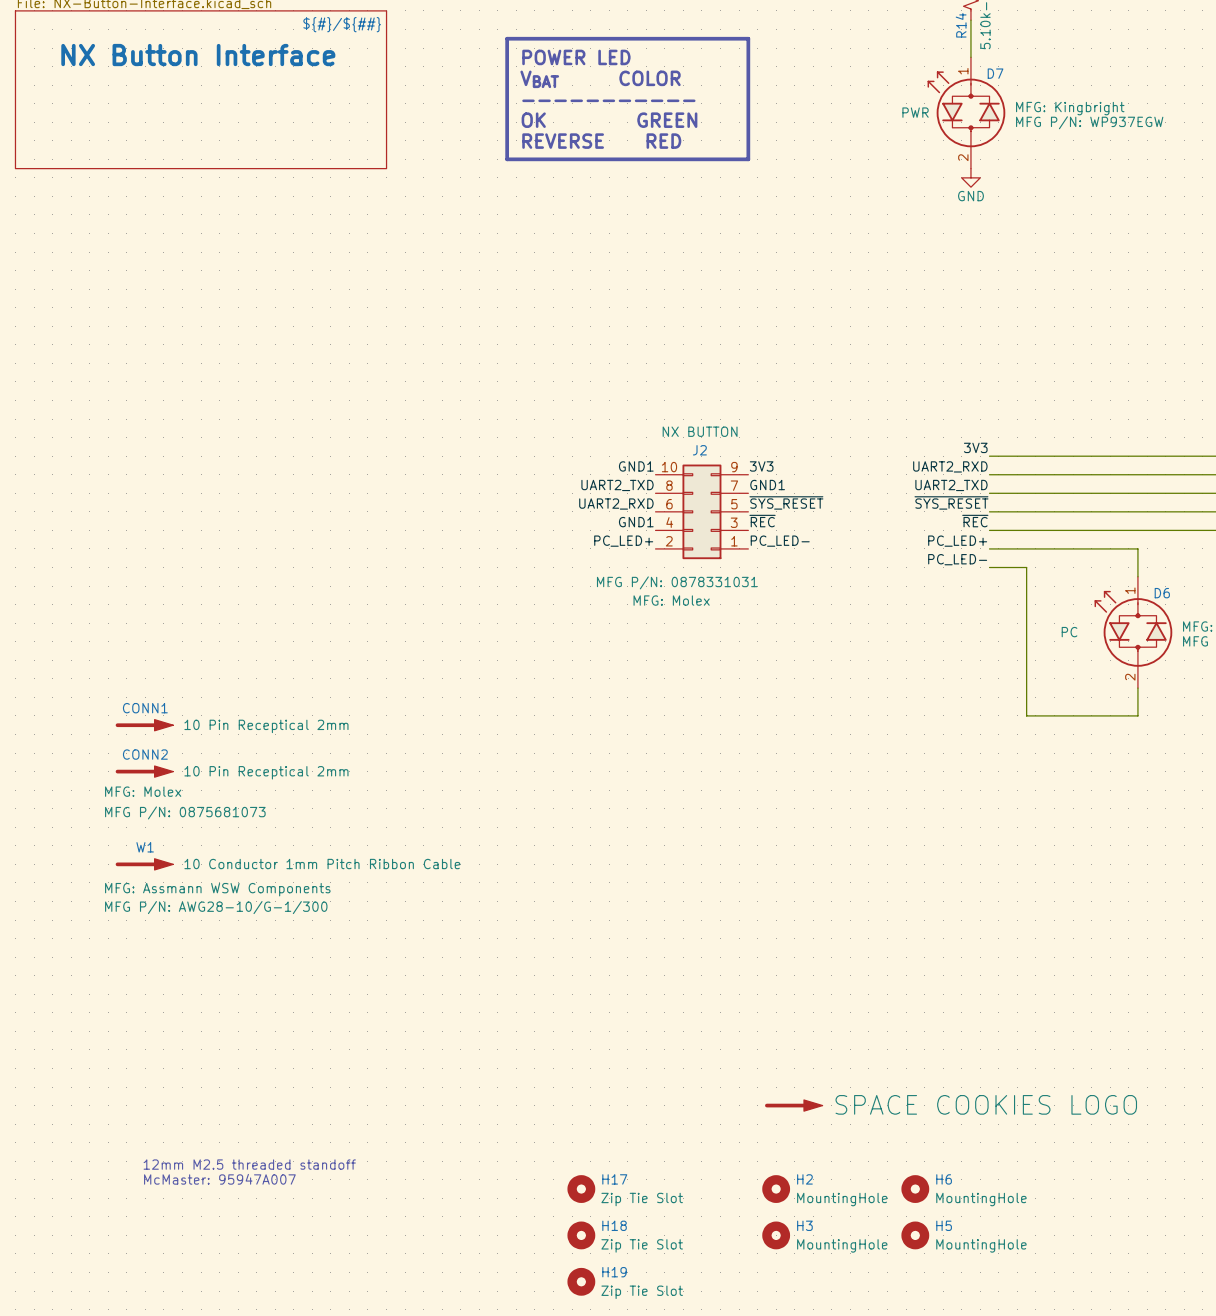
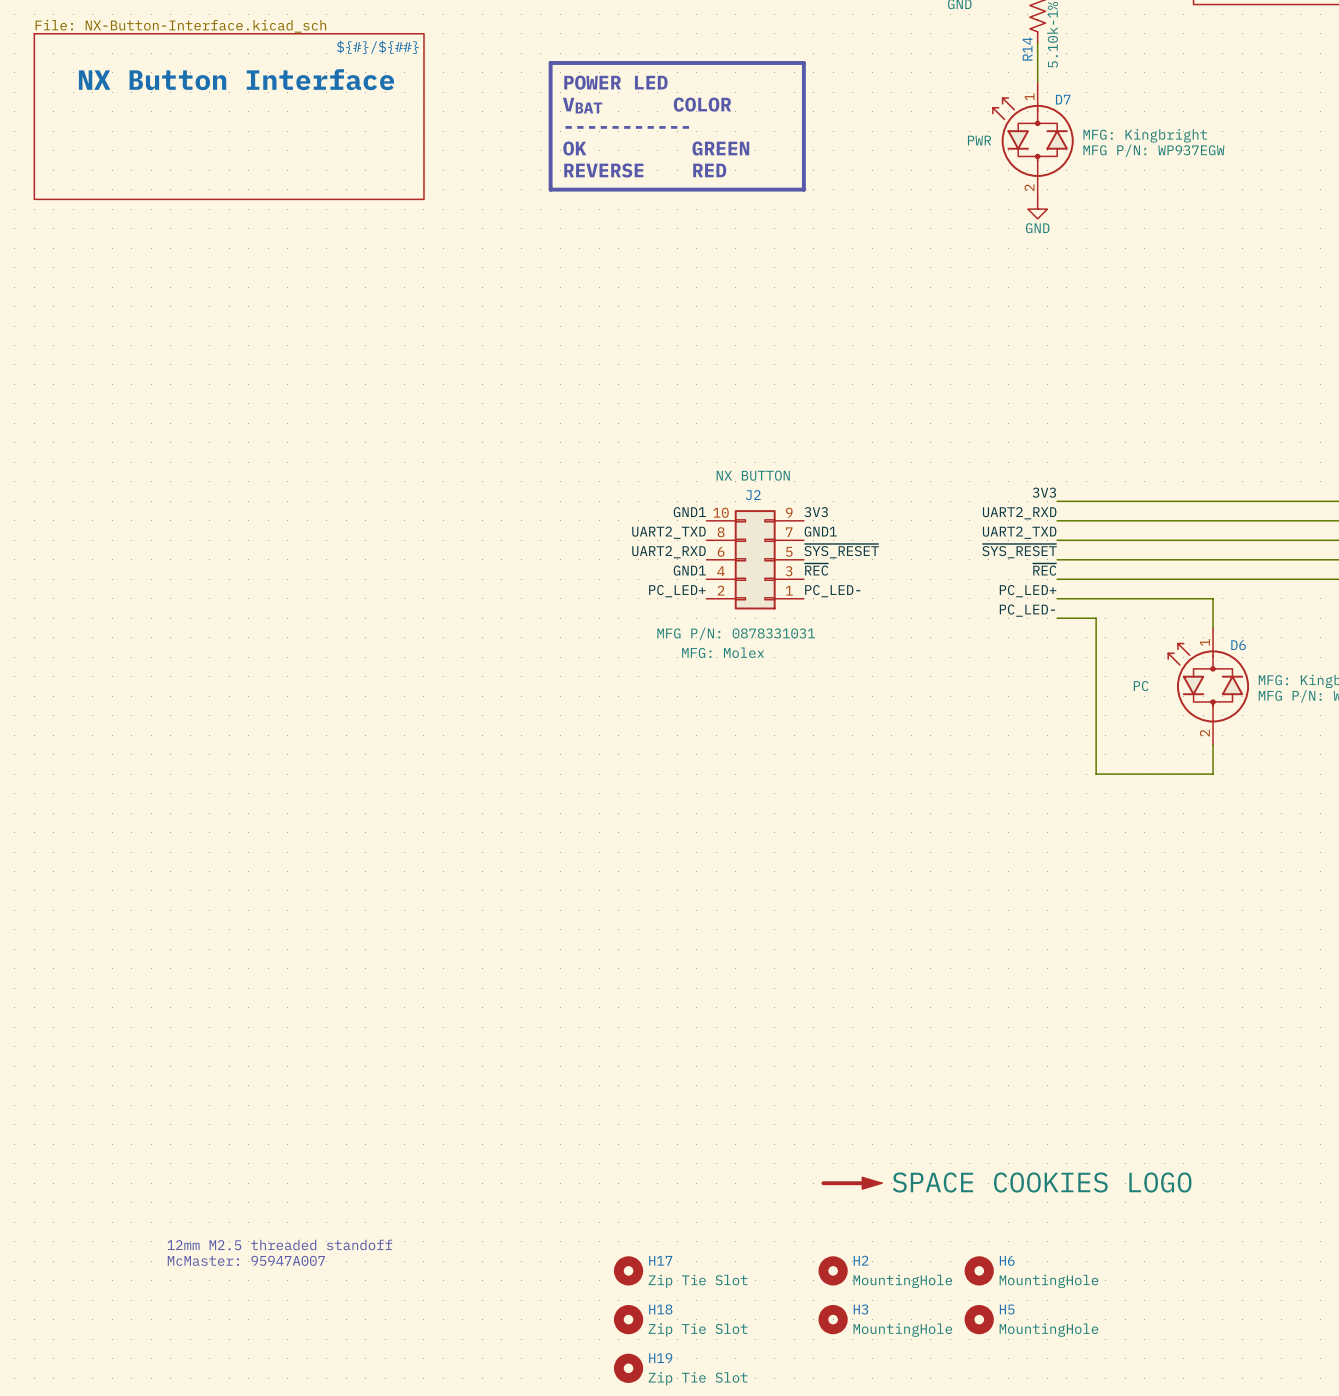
CONN1: 10 Pin Receptical 2mm (144, 725) -> none
CONN2: 10 Pin Receptical 2mm (144, 771) -> none
W1: 10 Conductor 1mm Pitch Ribbon Cable (144, 864) -> none

